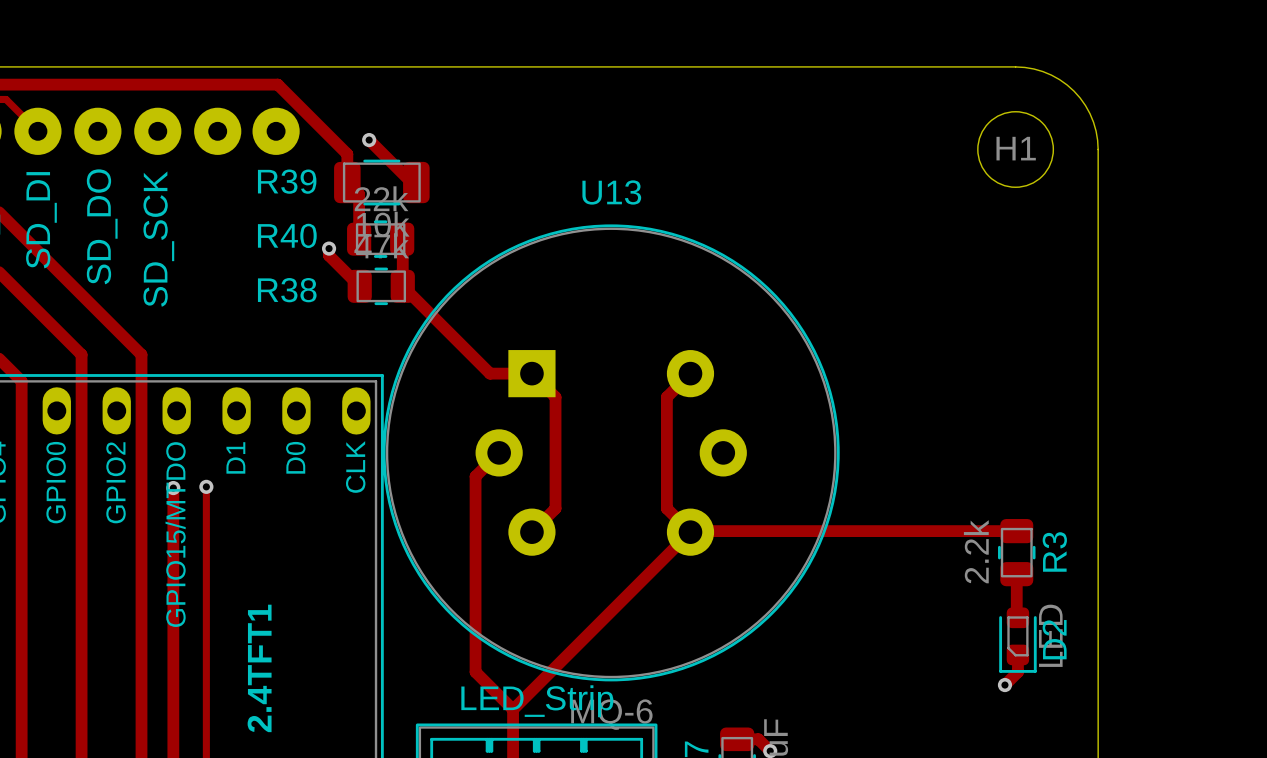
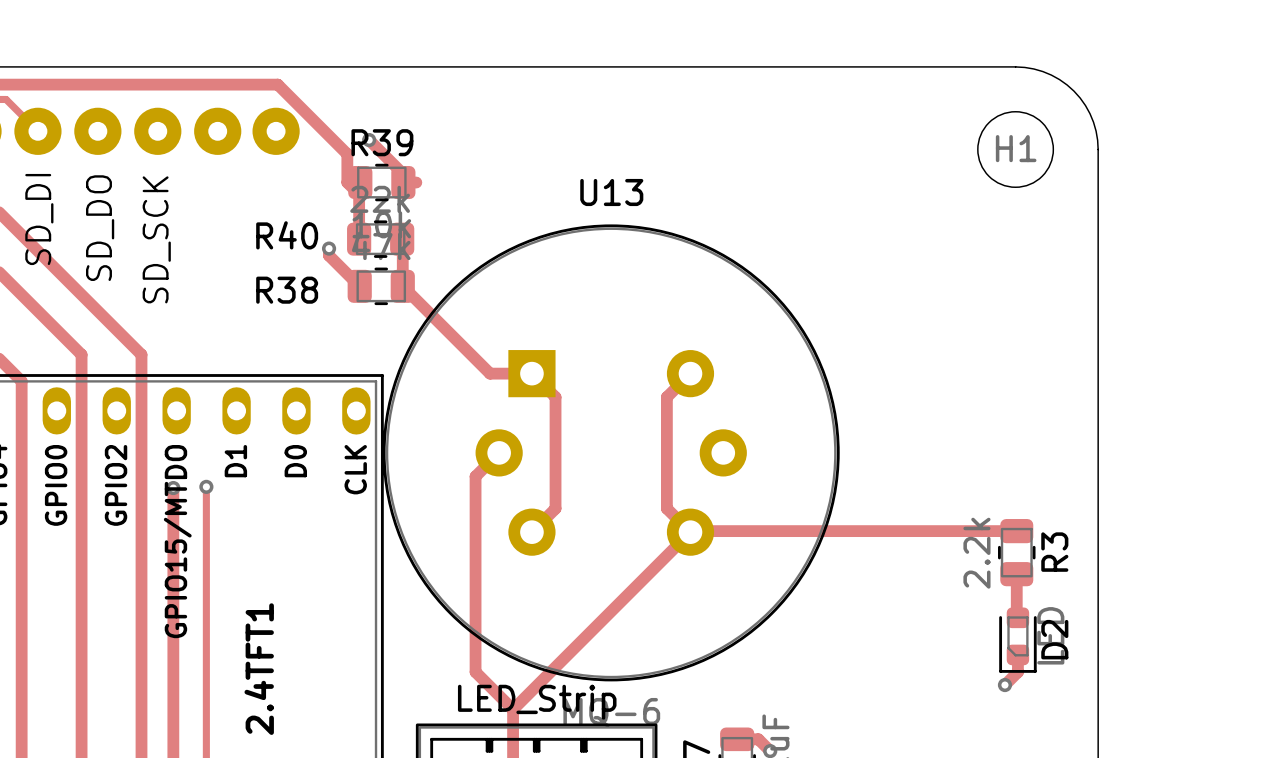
R39 footprint: [334, 159, 430, 206] -> [348, 163, 416, 202]
R39 name position: R39 (287, 181) -> R39 (382, 142)

